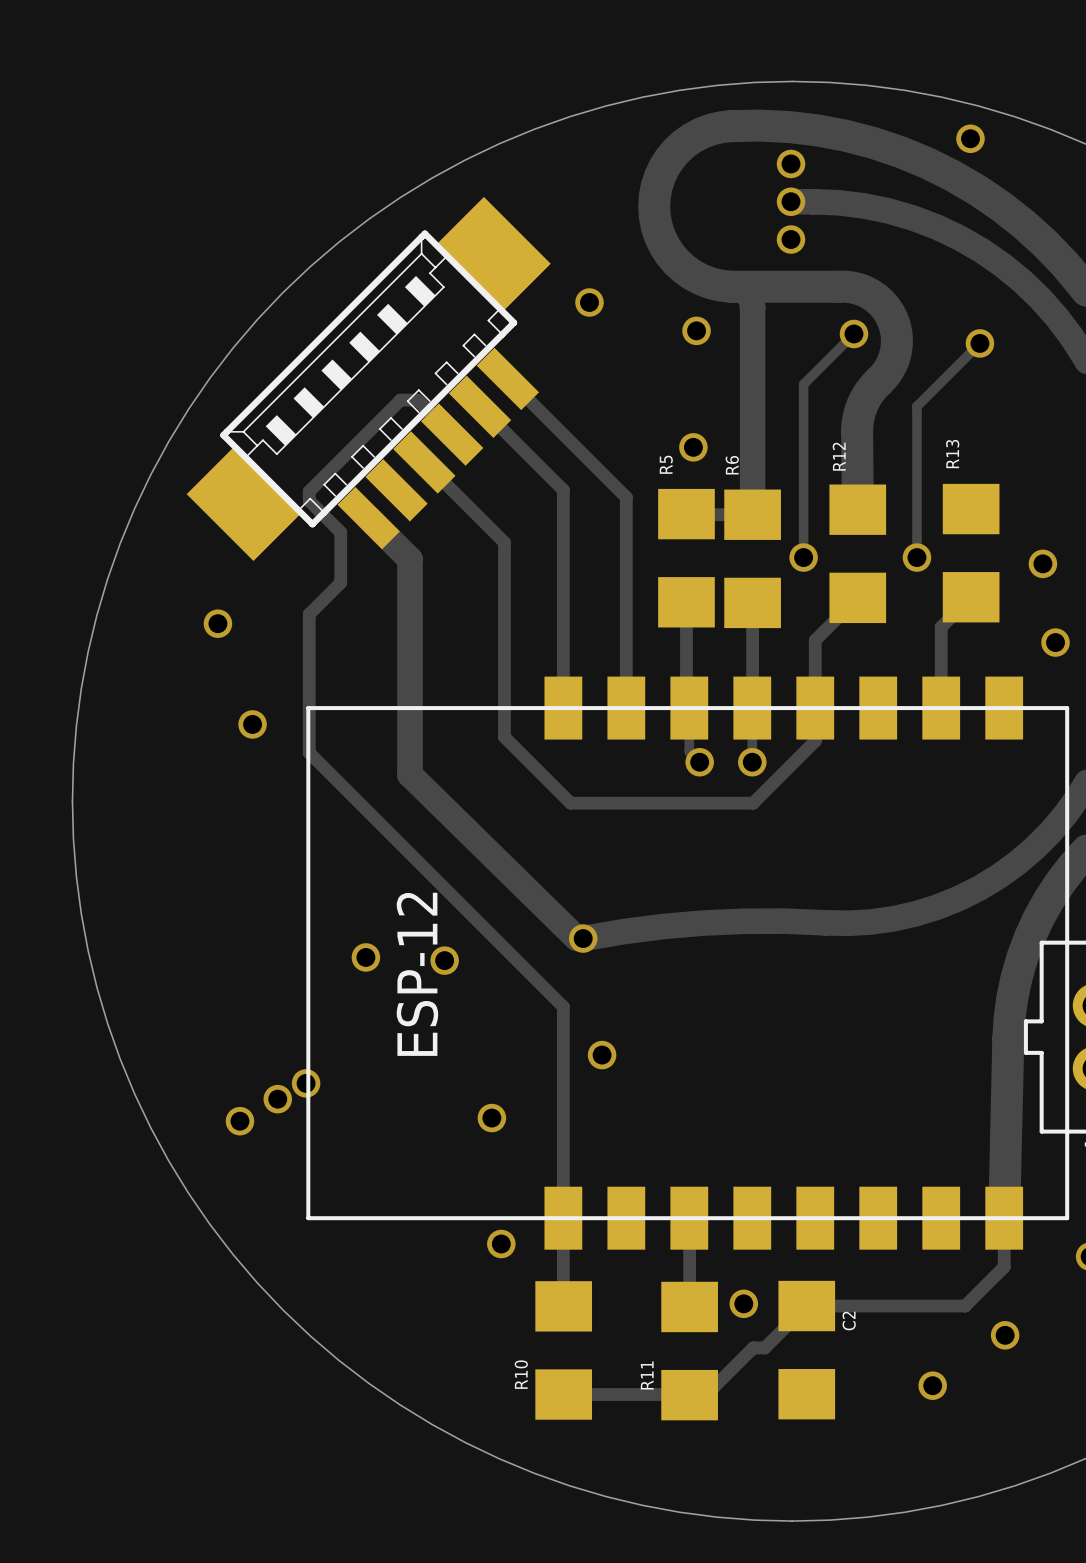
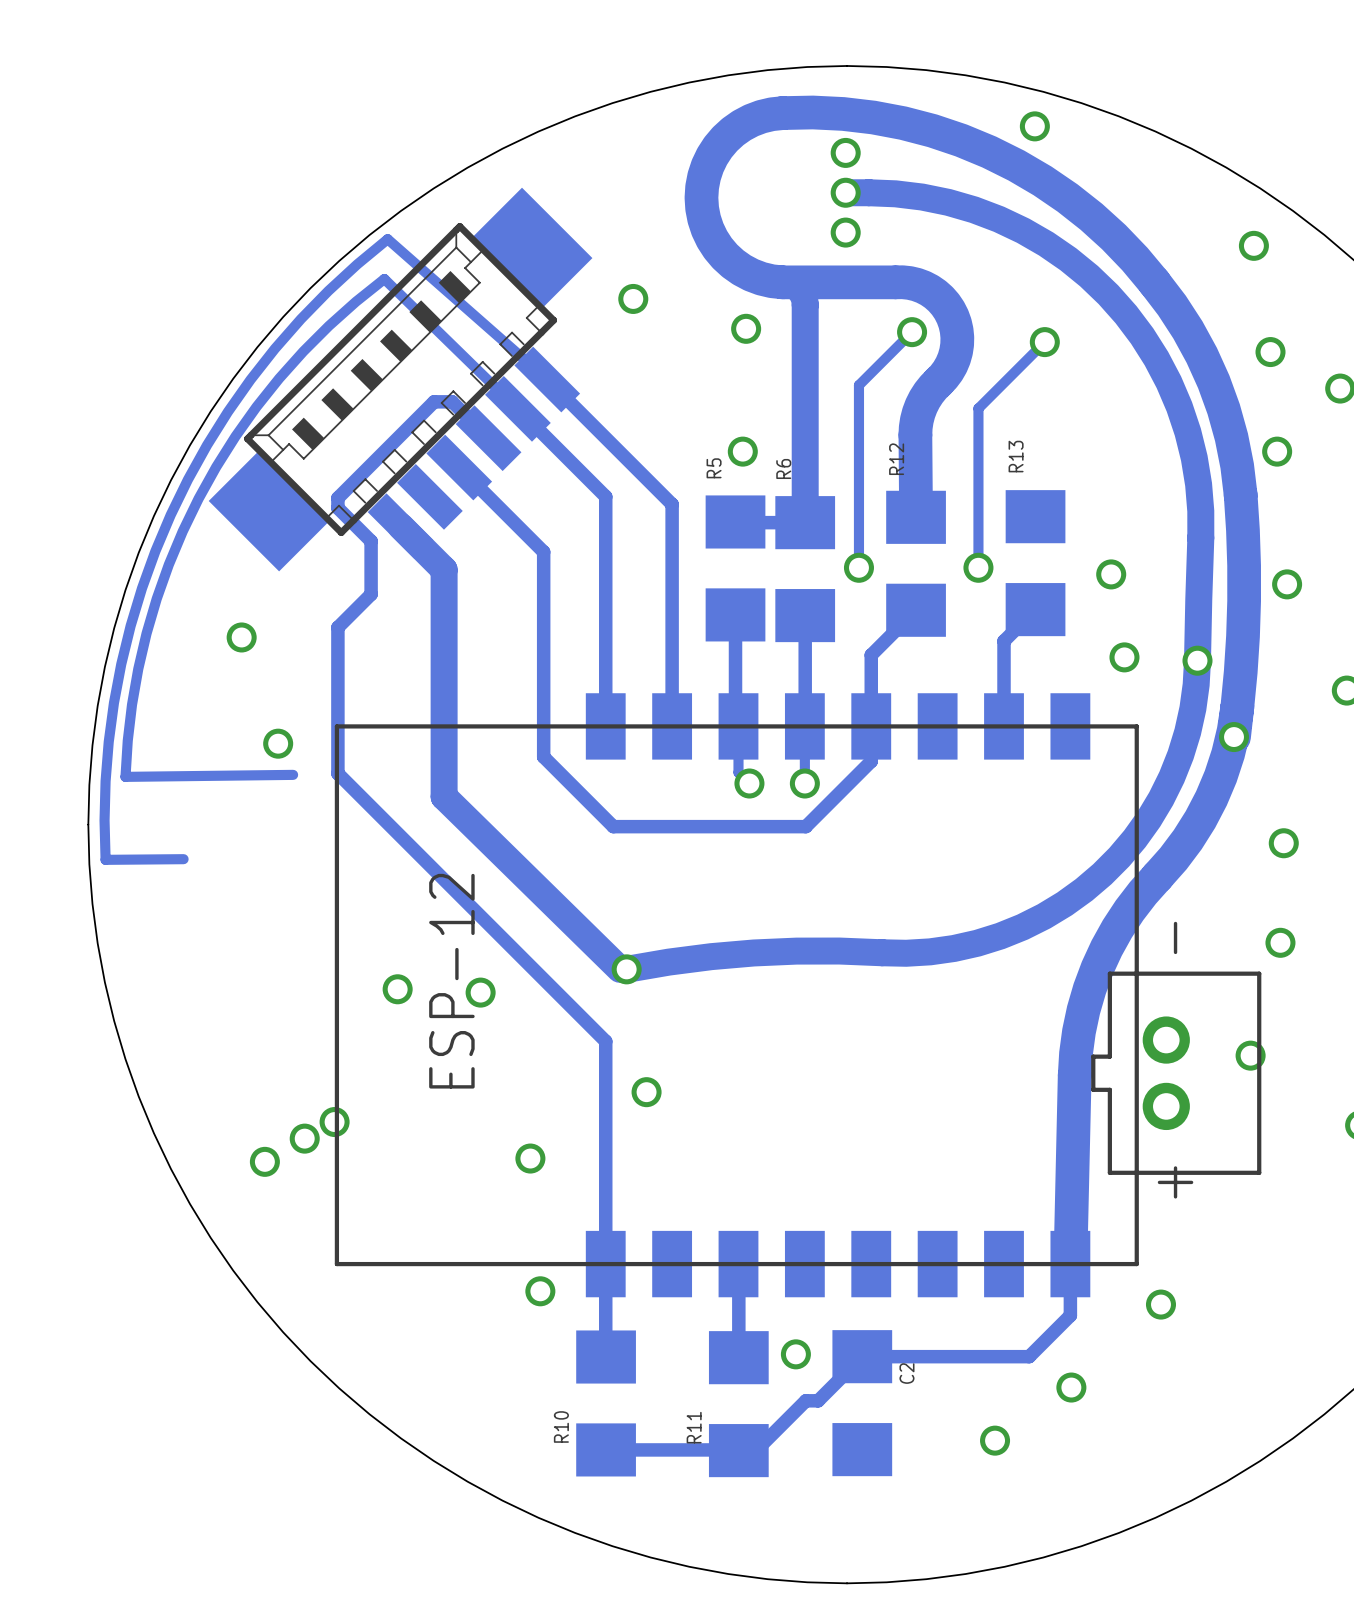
track: none -> (547, 379) (387, 239) (328, 290) (274, 348) (250, 379) (207, 445) (170, 515) (142, 588) (121, 664) (113, 702) (105, 781) (105, 859) (183, 859)
track: none -> (537, 428) (384, 279) (356, 301) (303, 351) (256, 406) (235, 436) (198, 498) (182, 531) (156, 598) (146, 633) (132, 704) (125, 776) (293, 774)

